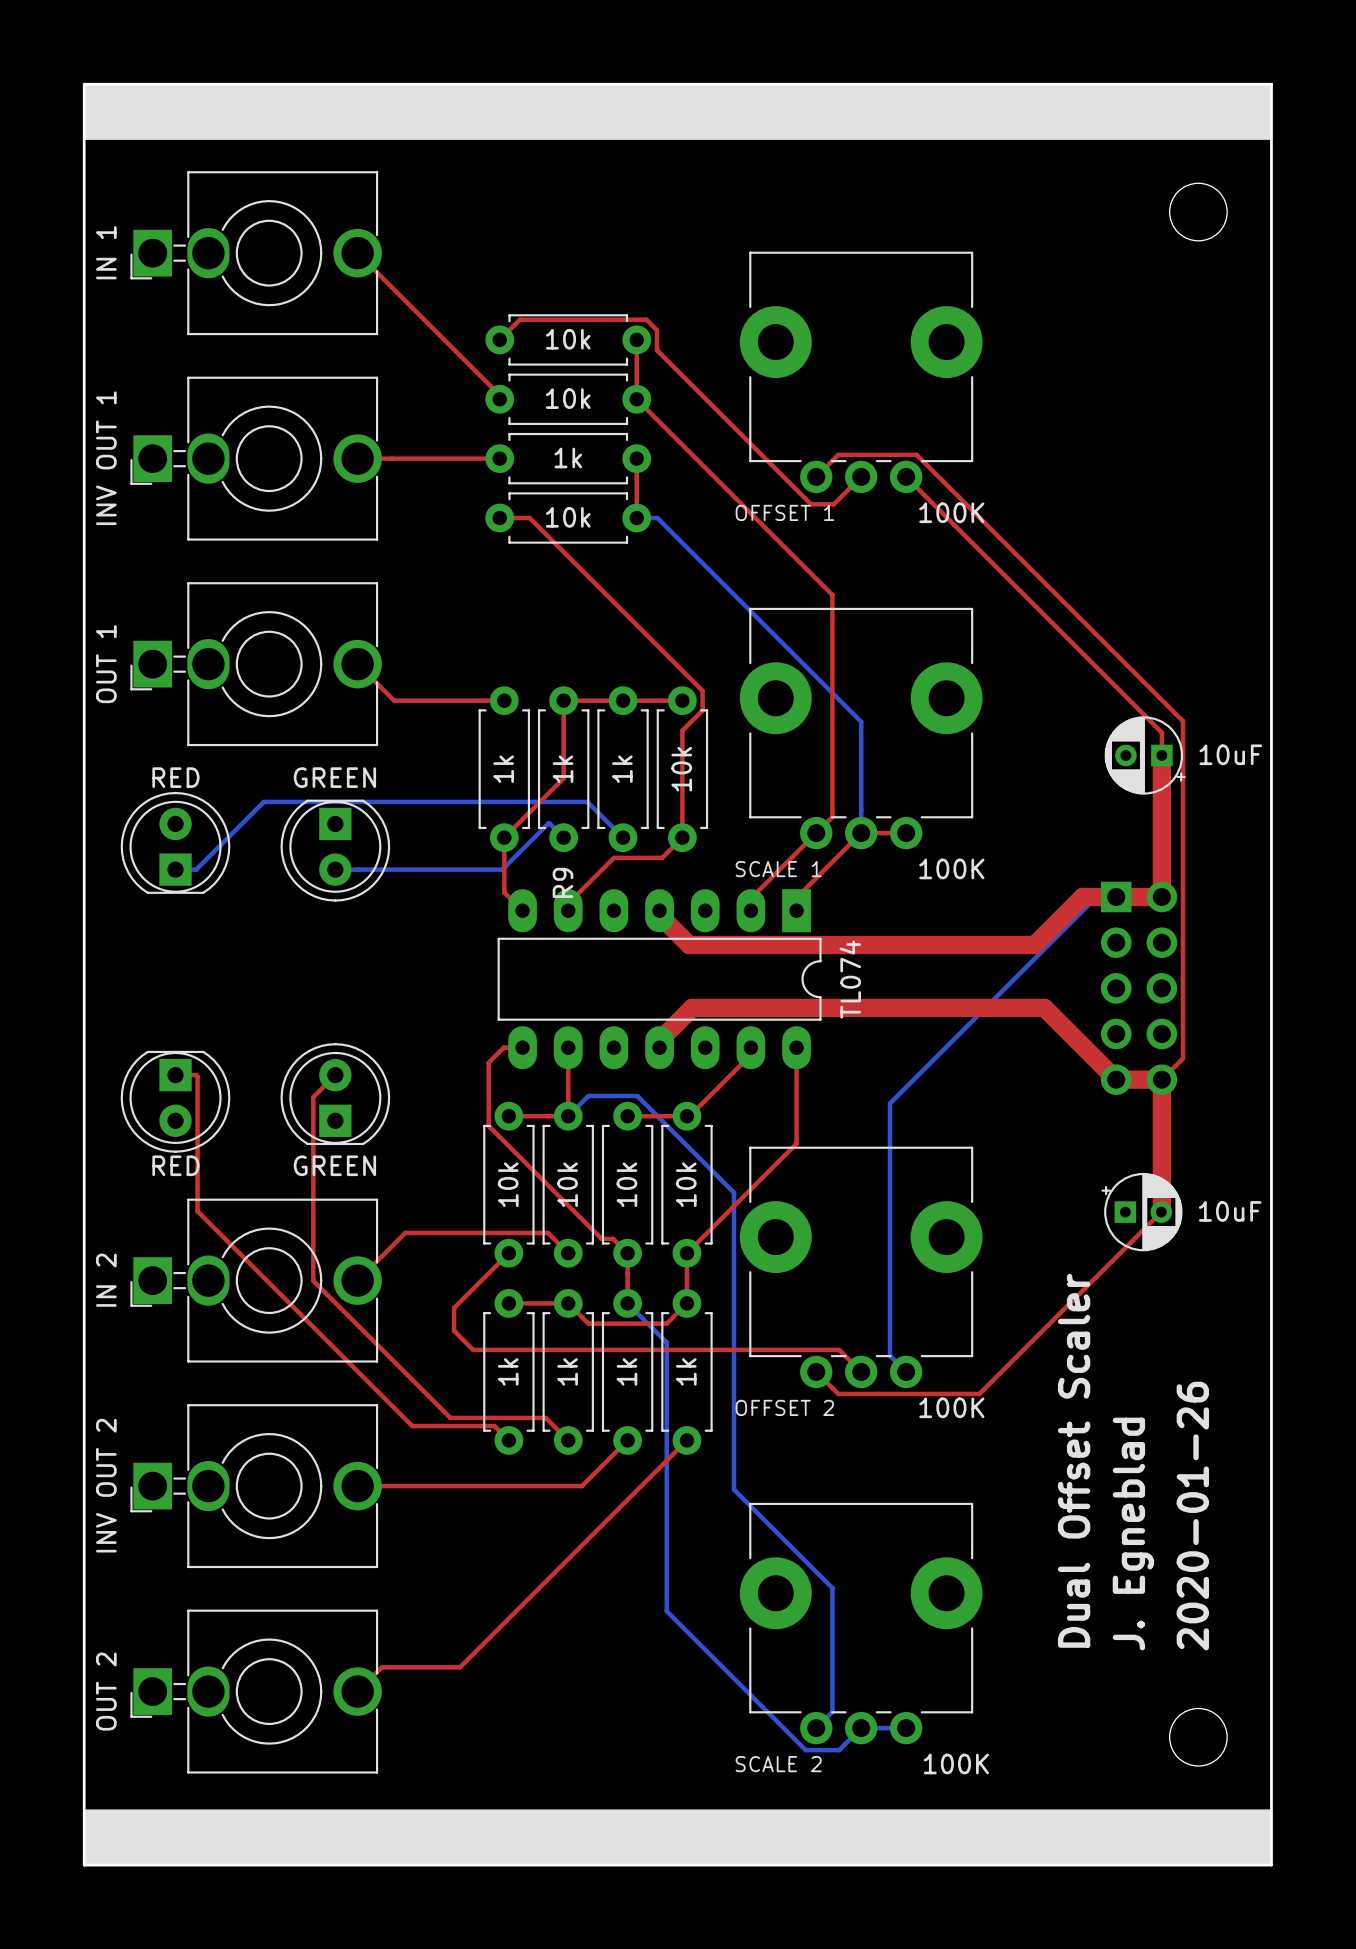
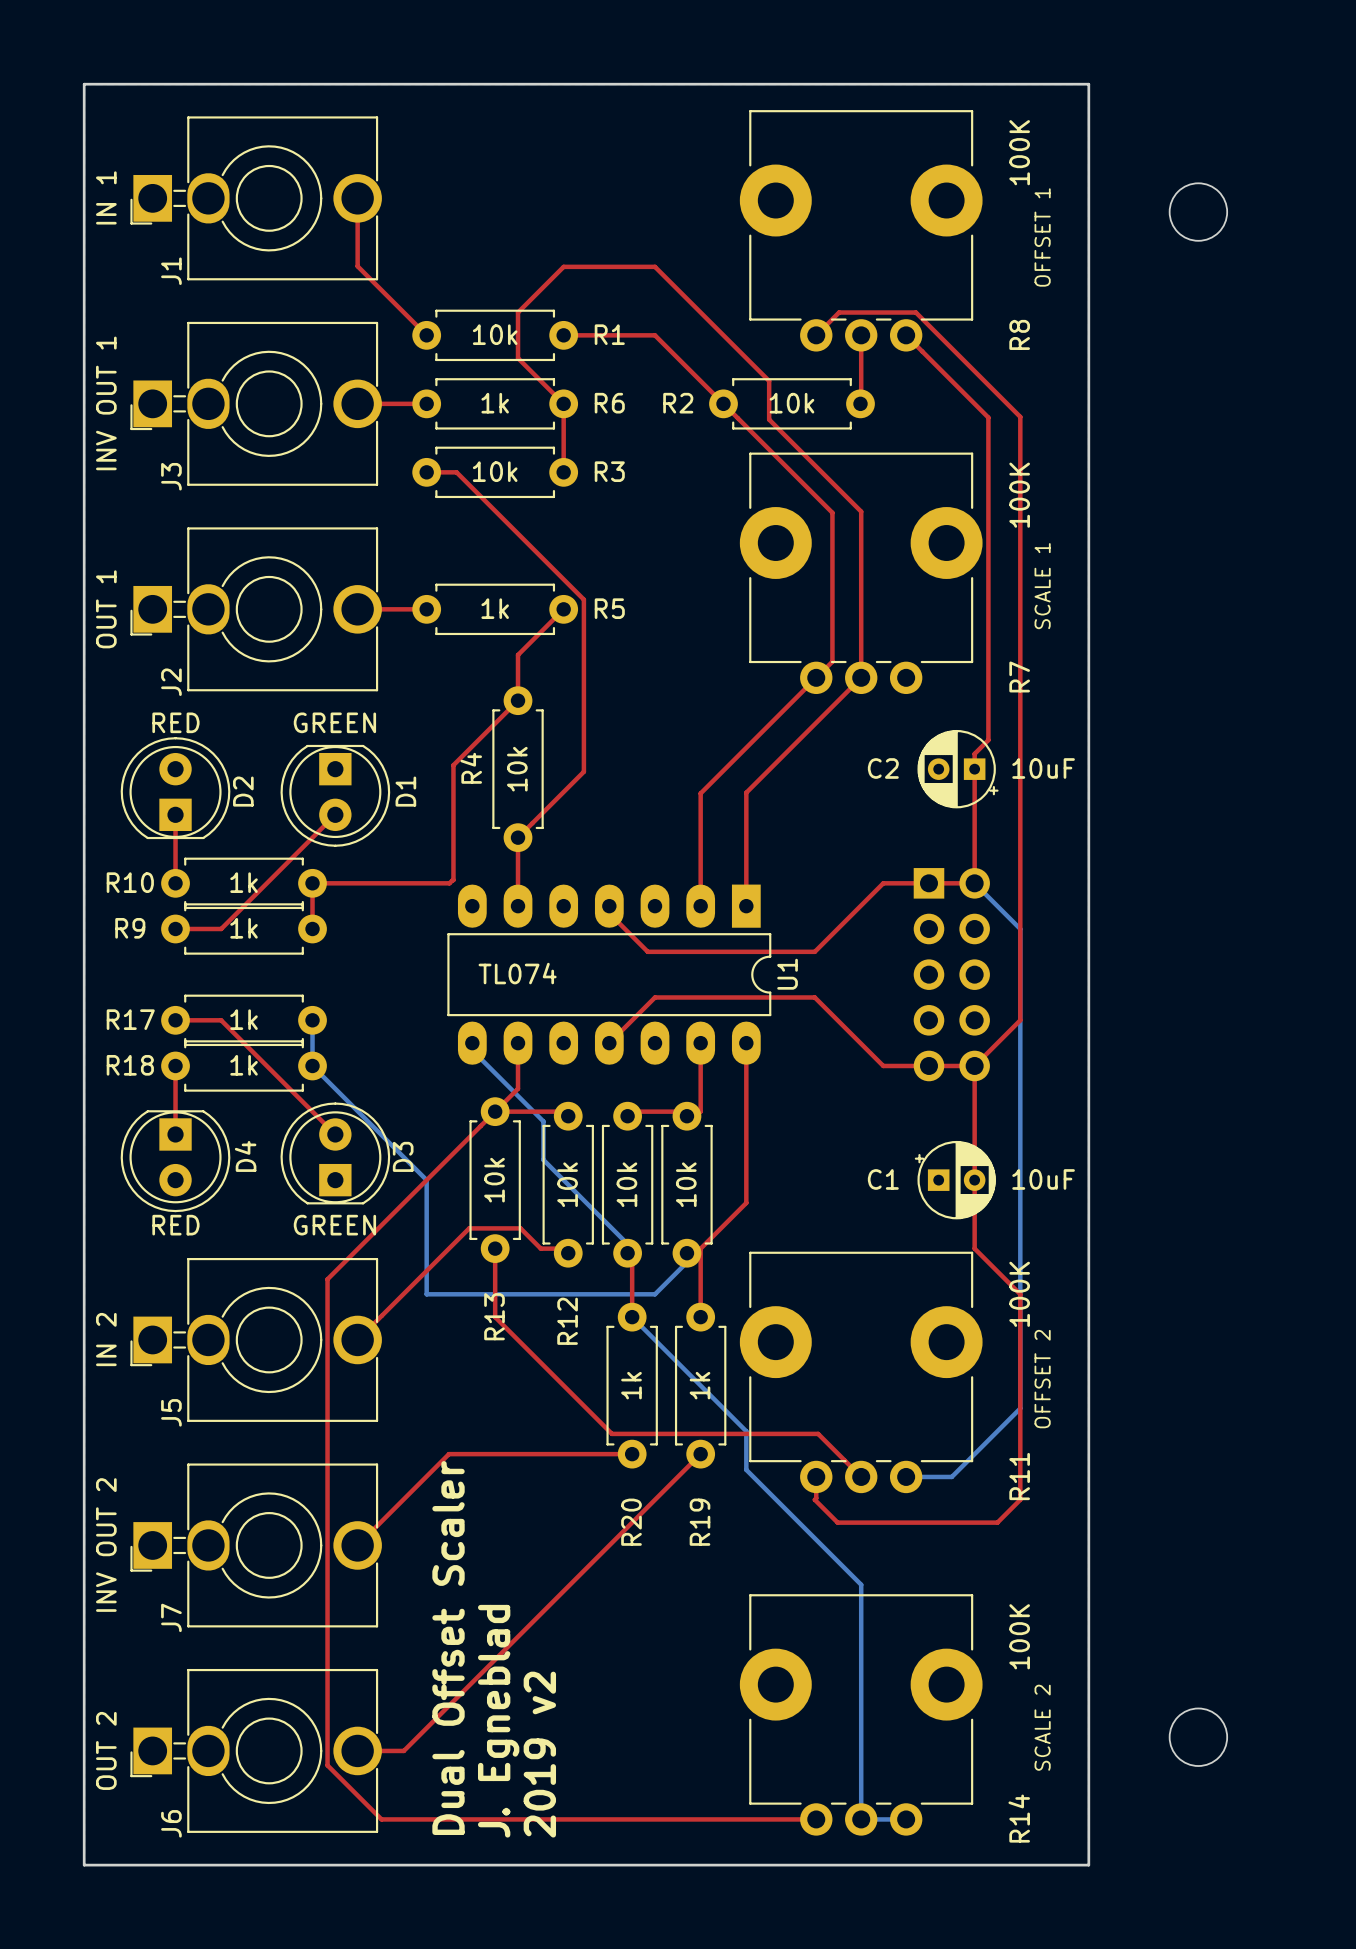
drawing: [83, 83, 1273, 140] -> none
board edge: (1088, 84) (1271, 84) (1271, 1865) (1088, 1865) -> (1088, 84) (1088, 1865)
J1: none -> IN 1 (256, 198)
top track: none -> (357, 198) (357, 266) (426, 335)
R8: none -> 100K (861, 230)
part: IN 1 (256, 253) -> none
top track: (357, 253) (499, 395) (499, 399) -> none
R1: none -> 10k (495, 335)
top track: none -> (816, 335) (839, 312) (915, 312) (1020, 416) (1020, 1020) (974, 1065)
top track: none -> (861, 335) (860, 403)
top track: none -> (906, 335) (988, 417) (988, 740) (974, 753) (974, 883) (883, 883) (814, 951) (647, 951) (609, 913) (609, 906)
top track: (499, 339) (519, 319) (646, 319) (656, 330) (656, 350) (811, 504) (833, 504) (861, 476) -> none
part: 10k (568, 339) -> none
top track: (636, 339) (636, 399) (832, 594) -> (563, 335) (655, 335) (832, 512) (832, 594)
part: 100K (861, 372) -> none
part: 10k (568, 399) -> none
J3: none -> INV OUT 1 (256, 403)
top track: none -> (357, 403) (426, 403)
R6: none -> 1k (495, 403)
R2: none -> 10k (791, 403)
part: INV OUT 1 (256, 458) -> none
top track: (357, 458) (499, 458) -> none
part: 1k (568, 458) -> none
top track: (636, 458) (636, 518) -> none
top track: none -> (426, 472) (456, 472) (583, 599) (583, 771) (518, 837) (518, 906)
R3: none -> 10k (495, 472)
top track: none -> (563, 472) (563, 403) (518, 358) (518, 312) (563, 266) (655, 266) (769, 381) (769, 419) (861, 511) (861, 677) (746, 792) (746, 906)
top track: (816, 476) (838, 454) (916, 454) (1183, 721) (1183, 1058) (1161, 1079) -> none
top track: (906, 476) (1161, 732) (1161, 897) (1082, 897) (1034, 945) (689, 945) (659, 915) (659, 910) -> none
text rotation: 0° (784, 512) -> 90° counterclockwise (1042, 237)
text position: OFFSET 1 (784, 512) -> OFFSET 1 (1042, 237)
top track: (499, 518) (529, 518) (702, 690) (702, 710) (682, 730) (682, 837) (662, 857) (613, 857) (568, 903) (568, 910) -> none
part: 10k (568, 518) -> none
bottom track: (636, 518) (657, 518) (861, 721) (861, 833) -> none
R7: none -> 100K (861, 573)
J2: none -> OUT 1 (256, 609)
top track: none -> (357, 609) (426, 609)
R5: none -> 1k (495, 609)
top track: none -> (563, 609) (518, 655) (518, 700) (453, 765) (453, 880) (449, 883) (312, 883) (312, 928)
top track: (832, 661) (832, 816) (750, 898) (750, 910) -> (832, 661) (700, 793) (700, 906)
part: OUT 1 (256, 664) -> none
top track: (357, 664) (394, 700) (504, 700) -> none
top track: (682, 700) (563, 700) (563, 778) (504, 837) (504, 892) (522, 910) -> none
part: 100K (861, 728) -> none
part: 10uF (1145, 755) -> none
R4 name: none -> R4 (471, 768)
R4 value: 1k (503, 769) -> 10k (517, 769)
R4 position: (504, 769) -> (518, 769)
R9 rotation: 0° (563, 769) -> 90° clockwise (244, 928)
R9 position: (563, 769) -> (244, 928)
part: 1k (623, 769) -> none
part: 10k (682, 769) -> none
C2: none -> 10uF (958, 769)
D2: none -> RED (175, 788)
D1: none -> GREEN (335, 795)
top track: none -> (175, 814) (175, 883)
top track: none -> (335, 814) (221, 928) (175, 928)
top track: (906, 833) (861, 833) (796, 897) (796, 910) -> none
bottom track: (563, 837) (548, 823) (502, 869) (335, 869) -> none
bottom track: (623, 837) (587, 801) (263, 801) (196, 869) (175, 869) -> none
part: RED (175, 842) -> none
part: GREEN (335, 850) -> none
text rotation: 0° (778, 869) -> 90° counterclockwise (1042, 586)
text position: SCALE 1 (778, 869) -> SCALE 1 (1042, 586)
R10: none -> 1k (244, 883)
bottom track: none -> (974, 883) (1020, 928) (1020, 1408) (951, 1476) (906, 1476)
bottom track: (1116, 897) (1096, 897) (889, 1103) (889, 1355) (906, 1371) -> none
U1: none -> TL074 (609, 974)
part: TL074 (659, 979) -> none
part position: (1139, 988) -> (951, 974)
top track: none -> (175, 1020) (221, 1020) (335, 1134)
R17: none -> 1k (244, 1020)
bottom track: none -> (312, 1020) (312, 1065) (426, 1180) (426, 1294) (655, 1294) (700, 1248)
bottom track: none -> (472, 1043) (472, 1050) (543, 1121) (543, 1159) (632, 1248)
top track: none -> (518, 1043) (518, 1088) (327, 1279) (327, 1765) (381, 1819) (816, 1819)
top track: none -> (609, 1043) (655, 997) (814, 997) (883, 1065) (974, 1065)
top track: none -> (700, 1043) (700, 1111) (632, 1111)
top track: none -> (746, 1043) (746, 1202) (700, 1248) (700, 1317)
top track: (522, 1047) (503, 1047) (488, 1062) (488, 1125) (601, 1238) (613, 1238) (627, 1253) (627, 1303) -> none
top track: (568, 1047) (568, 1116) (508, 1116) -> none
top track: (659, 1047) (659, 1040) (692, 1007) (1044, 1007) (1116, 1079) (1161, 1079) -> none
top track: (750, 1047) (750, 1054) (689, 1116) (627, 1116) -> none
top track: (796, 1047) (796, 1143) (686, 1253) (686, 1303) (666, 1323) (588, 1323) (568, 1303) (508, 1303) -> none
top track: none -> (175, 1065) (175, 1134)
R18: none -> 1k (244, 1065)
top track: none -> (974, 1065) (974, 1248) (1020, 1294) (1020, 1499) (997, 1522) (837, 1522) (814, 1499) (816, 1476)
top track: (175, 1075) (197, 1076) (197, 1211) (412, 1426) (494, 1426) (508, 1440) -> none
top track: (335, 1075) (313, 1097) (313, 1280) (450, 1417) (545, 1417) (568, 1440) -> none
top track: (1161, 1079) (1161, 1211) (979, 1393) (838, 1393) (816, 1371) -> none
part: GREEN (335, 1094) -> none
part: RED (175, 1101) -> none
top track: none -> (495, 1111) (563, 1111)
bottom track: (568, 1116) (588, 1095) (637, 1095) (734, 1192) (734, 1489) (832, 1588) (832, 1711) (816, 1728) -> none
D3: none -> GREEN (335, 1153)
D4: none -> RED (175, 1161)
C1: none -> 10uF (955, 1180)
R13 position: (508, 1184) -> (495, 1180)
part: 10uF (1141, 1212) -> none
top track: none -> (495, 1248) (495, 1317) (611, 1433) (818, 1433) (861, 1476)
top track: none -> (563, 1248) (540, 1248) (520, 1228) (469, 1228) (357, 1339)
top track: none -> (632, 1248) (632, 1317)
top track: (508, 1253) (454, 1308) (454, 1330) (473, 1349) (839, 1349) (861, 1371) -> none
top track: (568, 1253) (548, 1232) (405, 1232) (357, 1280) -> none
part: 100K (861, 1267) -> none
part: IN 2 (256, 1280) -> none
bottom track: (627, 1303) (666, 1342) (666, 1611) (805, 1750) (839, 1750) (861, 1728) (906, 1728) -> none
R13 name: none -> R13 (494, 1316)
bottom track: none -> (632, 1317) (746, 1431) (746, 1469) (861, 1584) (861, 1819) (906, 1819)
R12 name: none -> R12 (567, 1321)
J5: none -> IN 2 (256, 1339)
part: 1k (508, 1371) -> none
part: 1k (568, 1371) -> none
R20 position: (627, 1371) -> (632, 1385)
part: 1k (686, 1371) -> none
R11: none -> 100K (861, 1372)
R19: none -> 1k (700, 1385)
text rotation: 0° (784, 1407) -> 90° counterclockwise (1042, 1379)
text position: OFFSET 2 (784, 1407) -> OFFSET 2 (1042, 1379)
top track: (627, 1440) (581, 1486) (357, 1486) -> none
top track: (686, 1440) (460, 1667) (381, 1667) (357, 1691) -> none
top track: none -> (632, 1454) (448, 1454) (357, 1545)
top track: none -> (700, 1454) (403, 1750) (357, 1750)
text: Dual Offset Scaler (1074, 1460) -> none
part: INV OUT 2 (256, 1486) -> none
text: 2020-01-26 (1192, 1516) -> none
R20 name: none -> R20 (631, 1522)
text: J. Egneblad (1133, 1534) -> none
J7: none -> INV OUT 2 (256, 1545)
part: 100K (861, 1623) -> none
text: none -> Dual Offset Scaler (448, 1648)
part: OUT 2 (256, 1691) -> none
R14: none -> 100K (861, 1714)
text: none -> J. Egneblad (498, 1721)
J6: none -> OUT 2 (256, 1750)
text: none -> 2019 v2 (539, 1754)
text rotation: 0° (778, 1764) -> 90° counterclockwise (1042, 1727)
text position: SCALE 2 (778, 1764) -> SCALE 2 (1042, 1727)
drawing: [83, 1809, 1273, 1867] -> none

